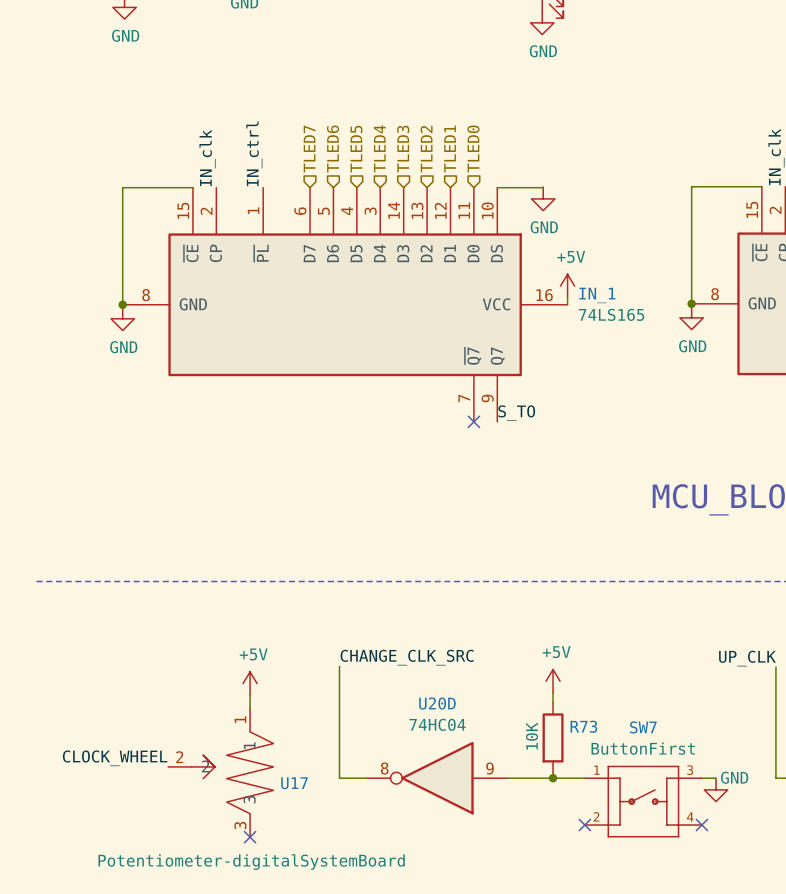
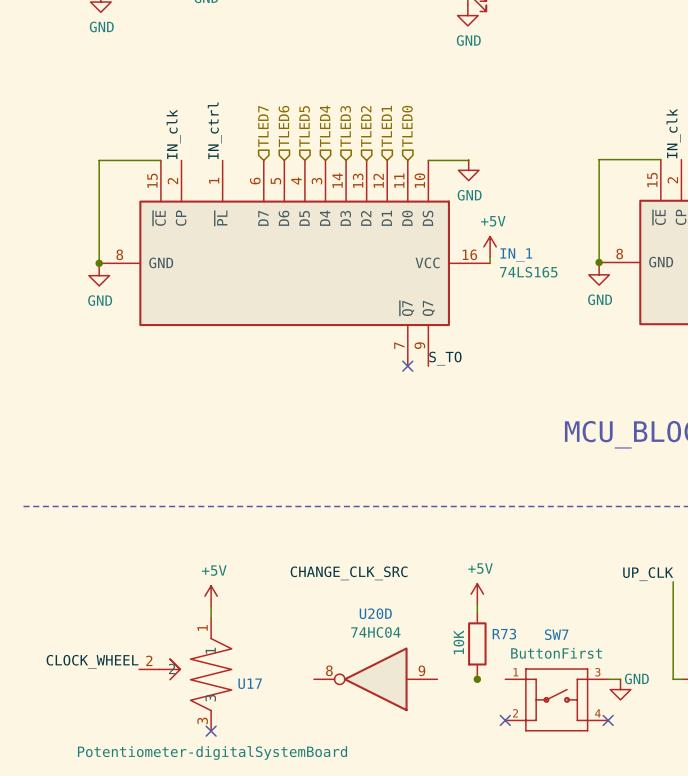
wire: (339, 666) (339, 778) (367, 778) -> none
wire: (507, 778) (584, 778) -> none

